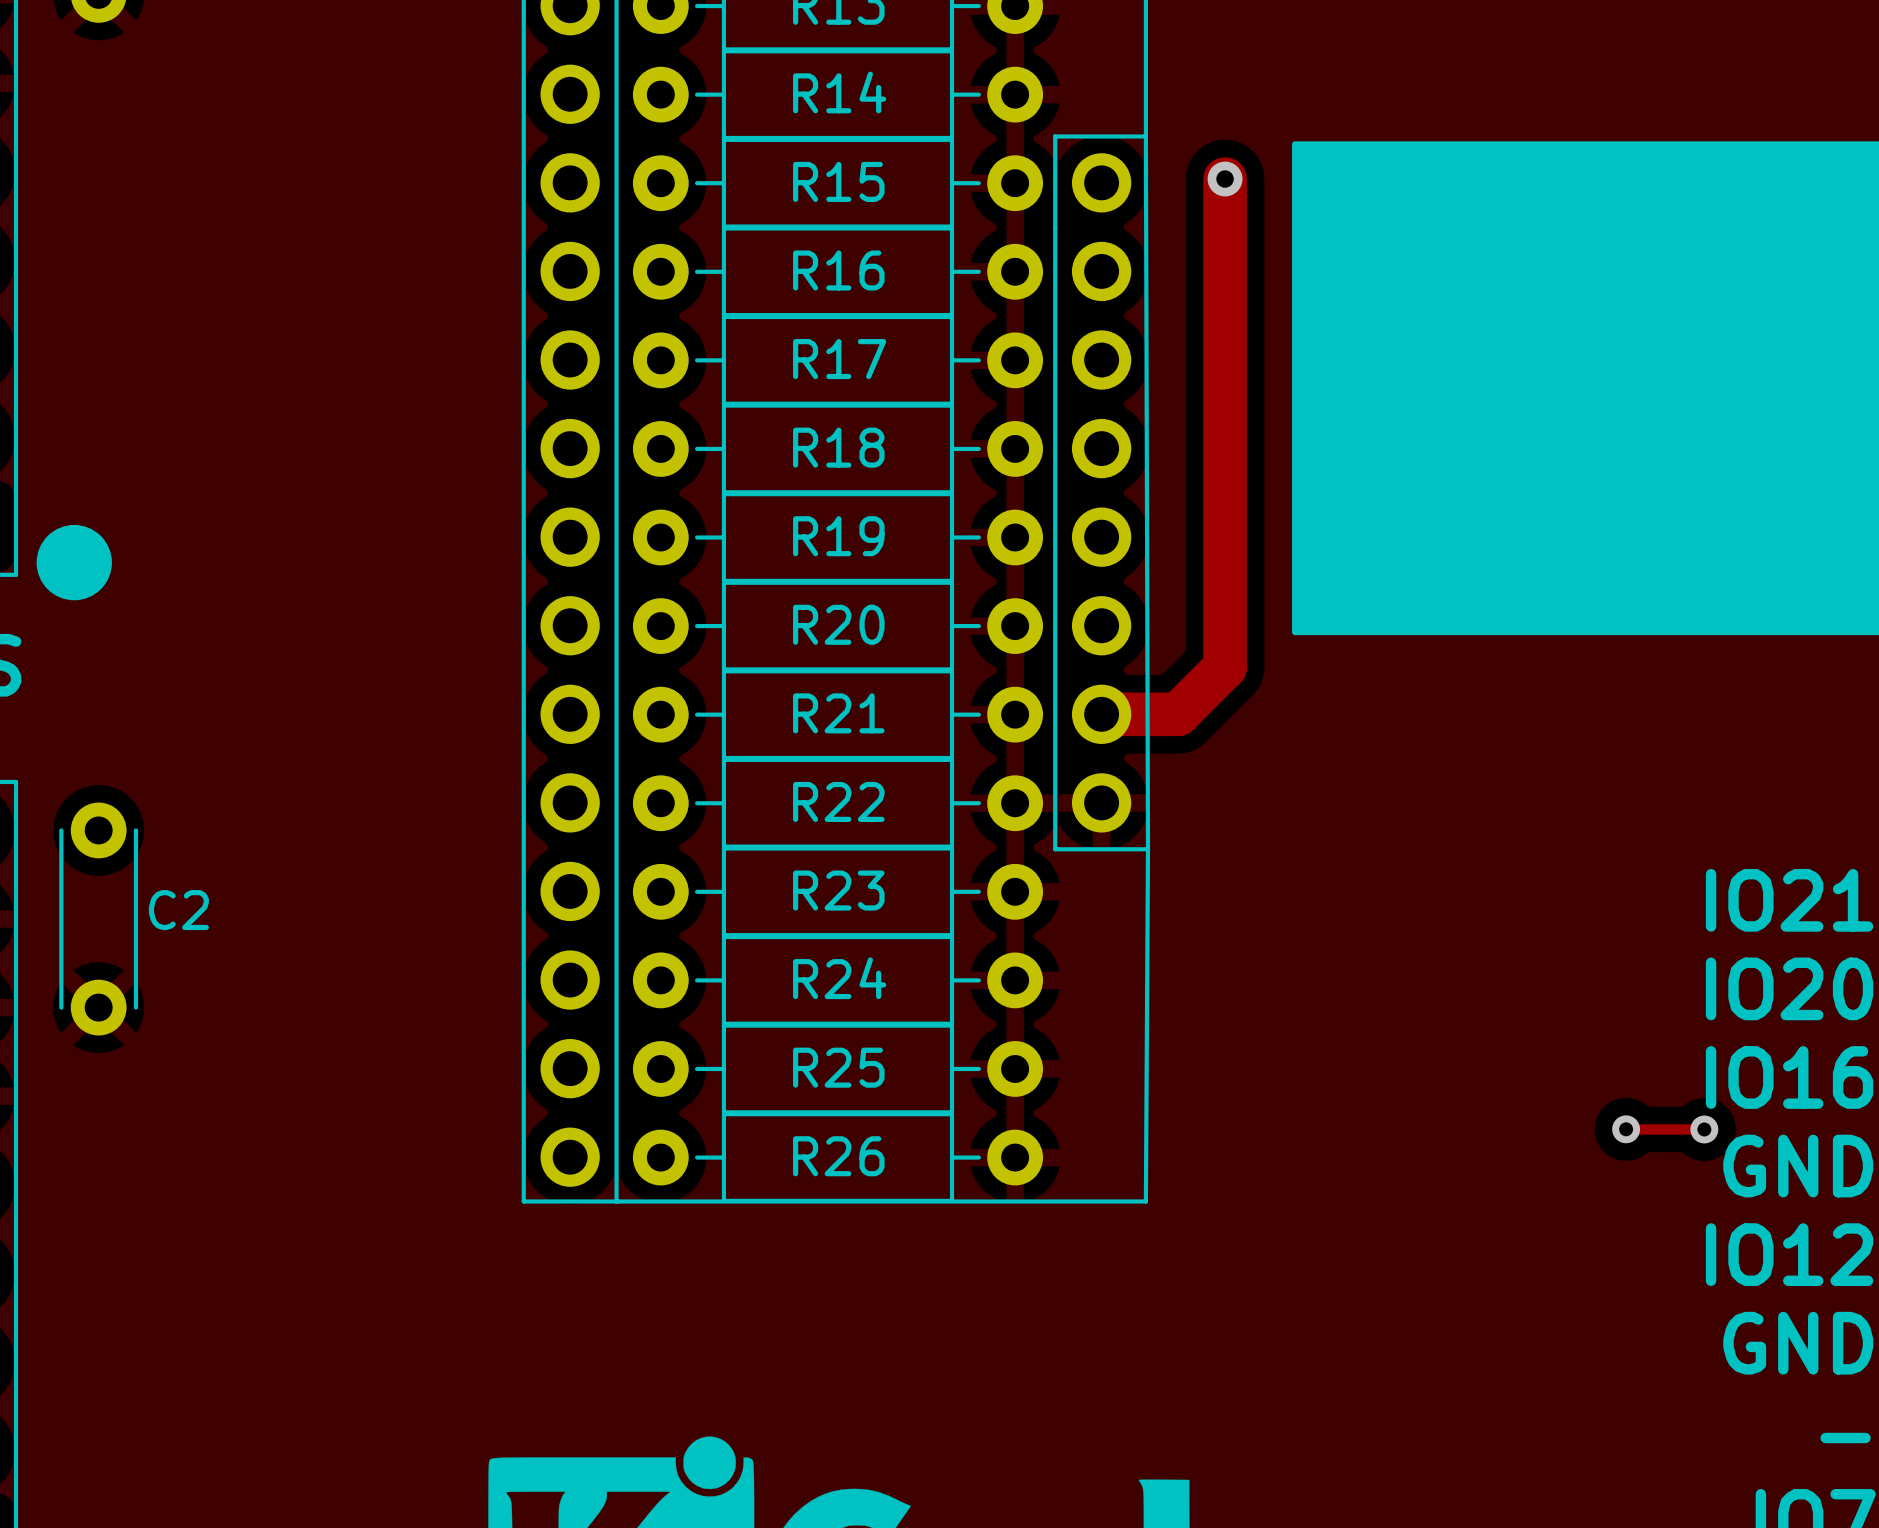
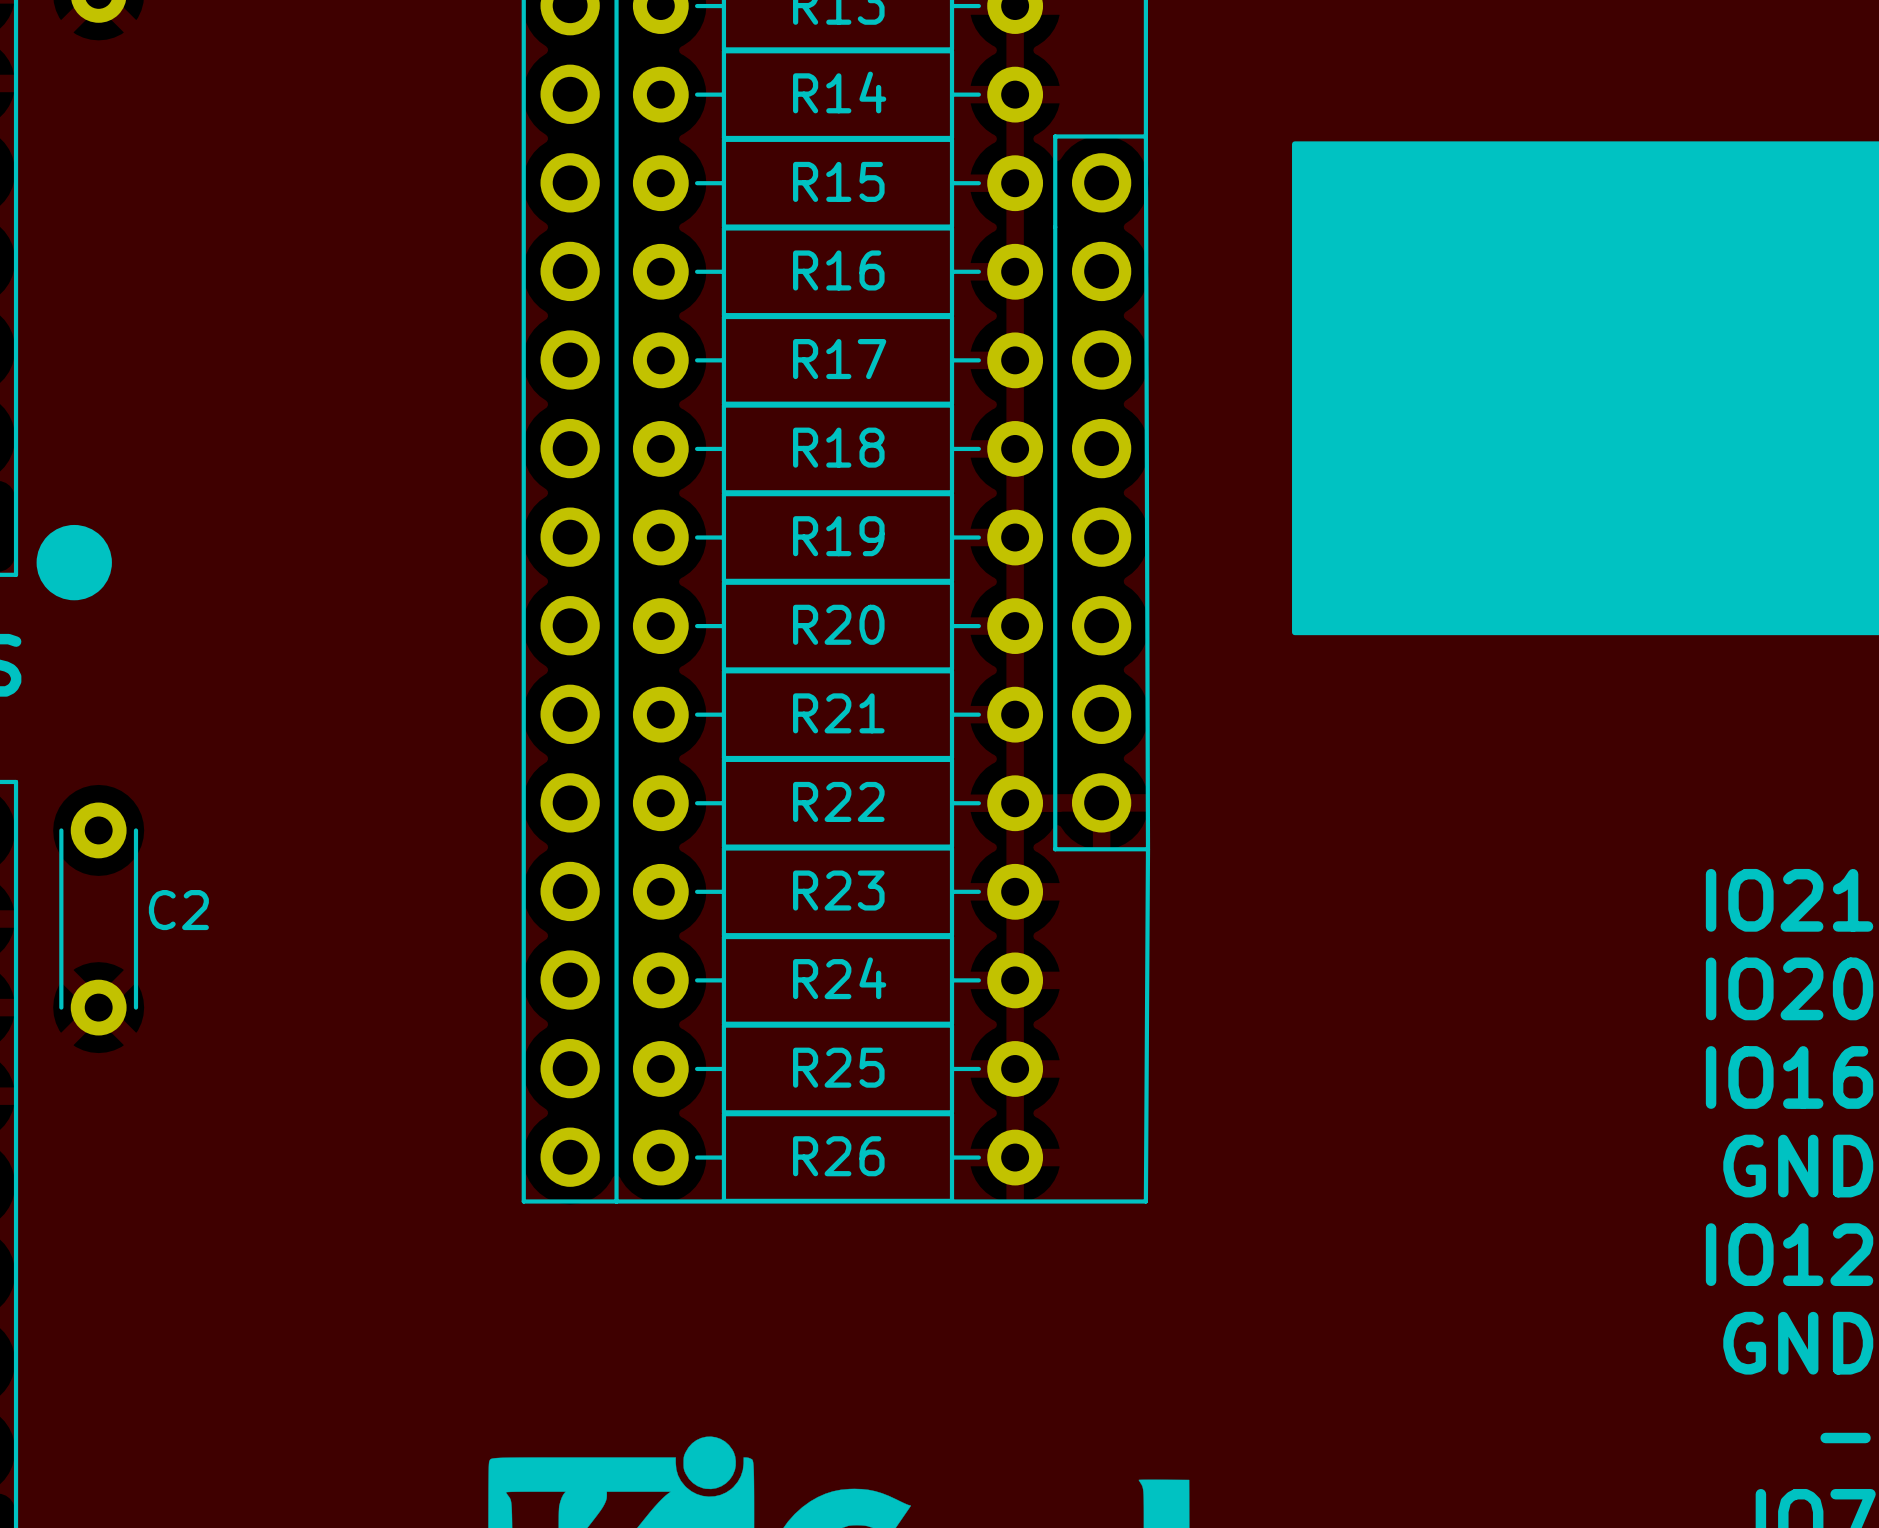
track: (1225, 179) (1225, 667) (1177, 714) (1101, 714) -> none
via: (1225, 179) -> none
track: (1626, 1129) (1704, 1129) -> none
via: (1626, 1129) -> none
via: (1704, 1129) -> none

